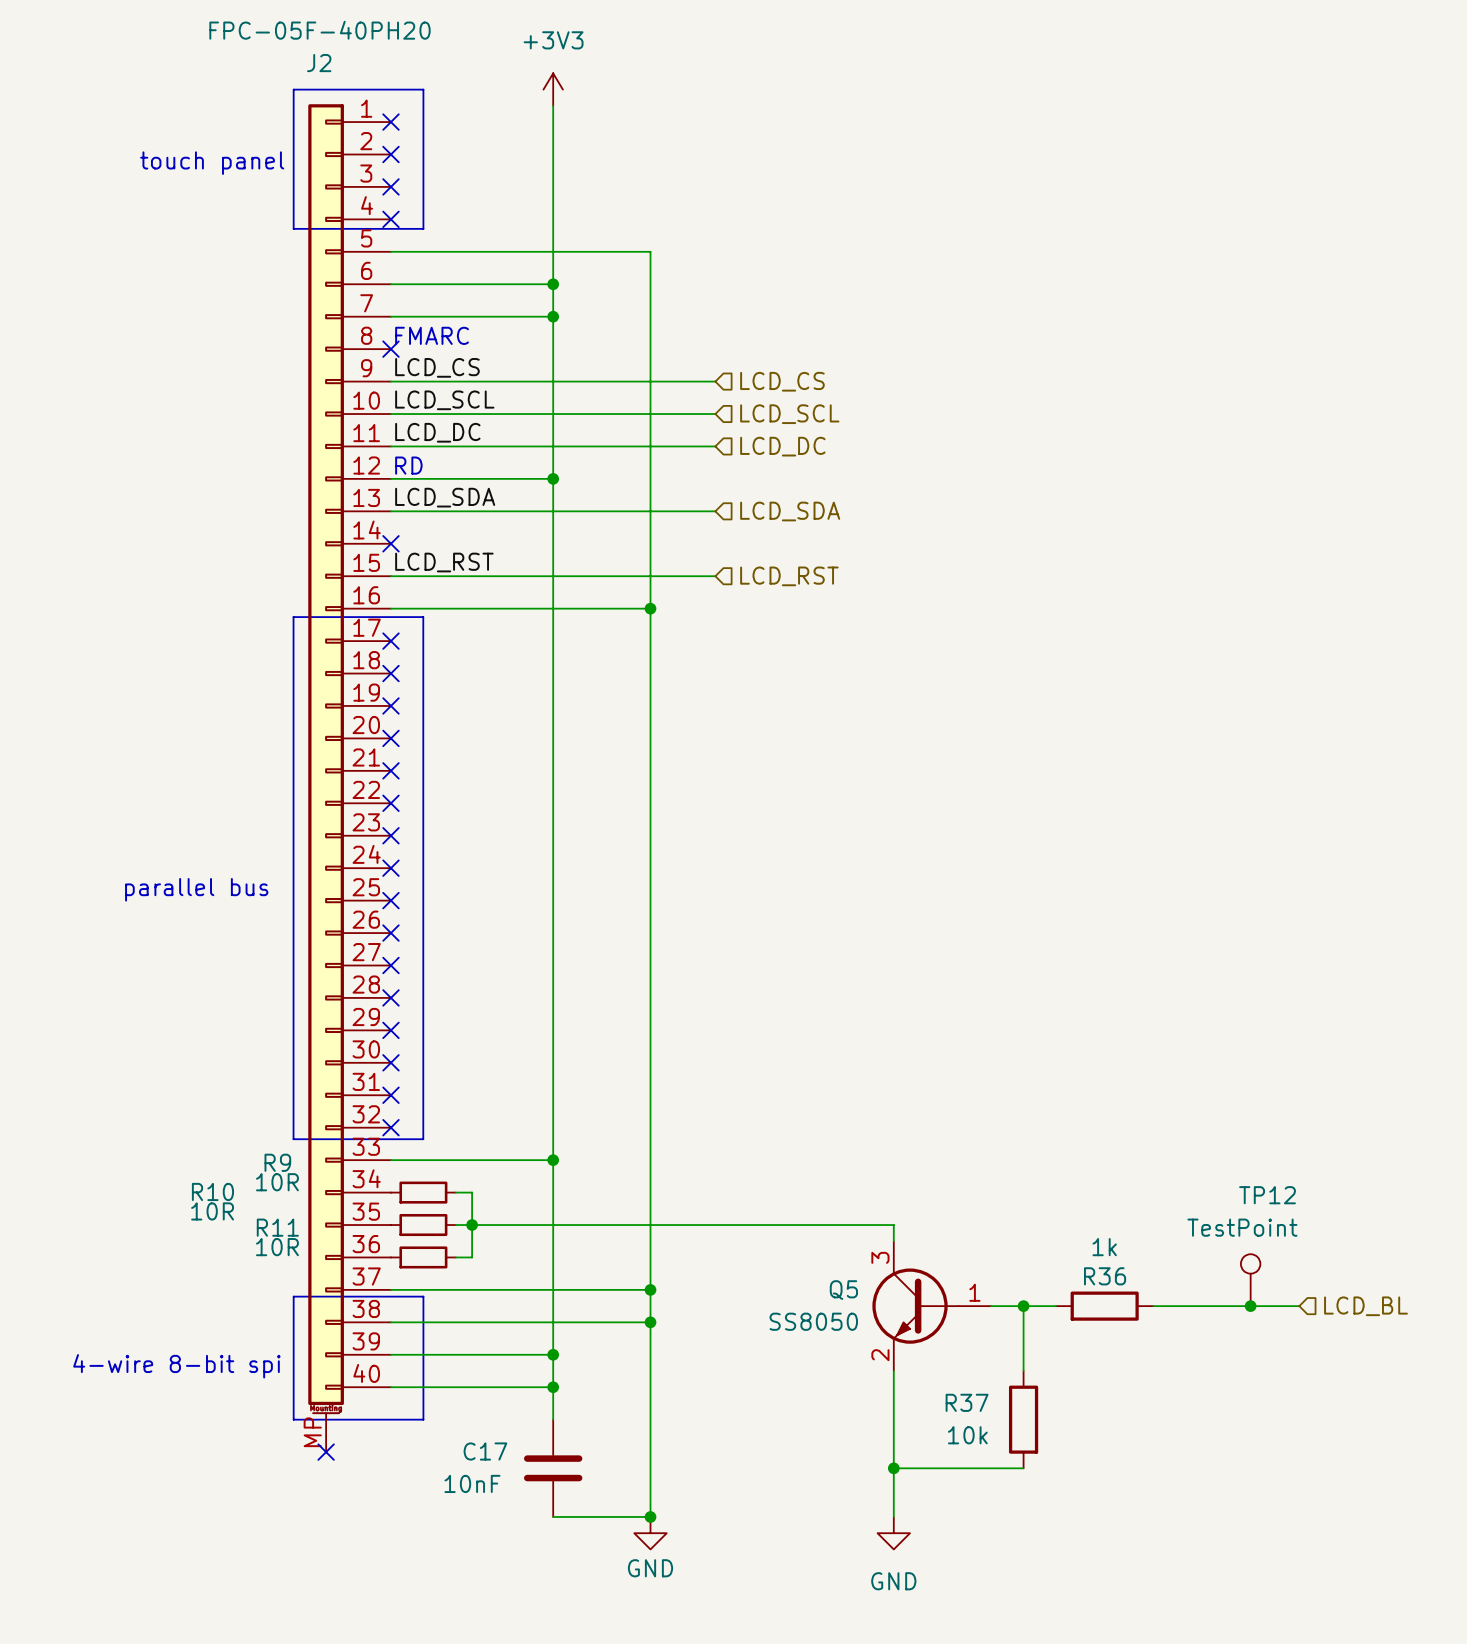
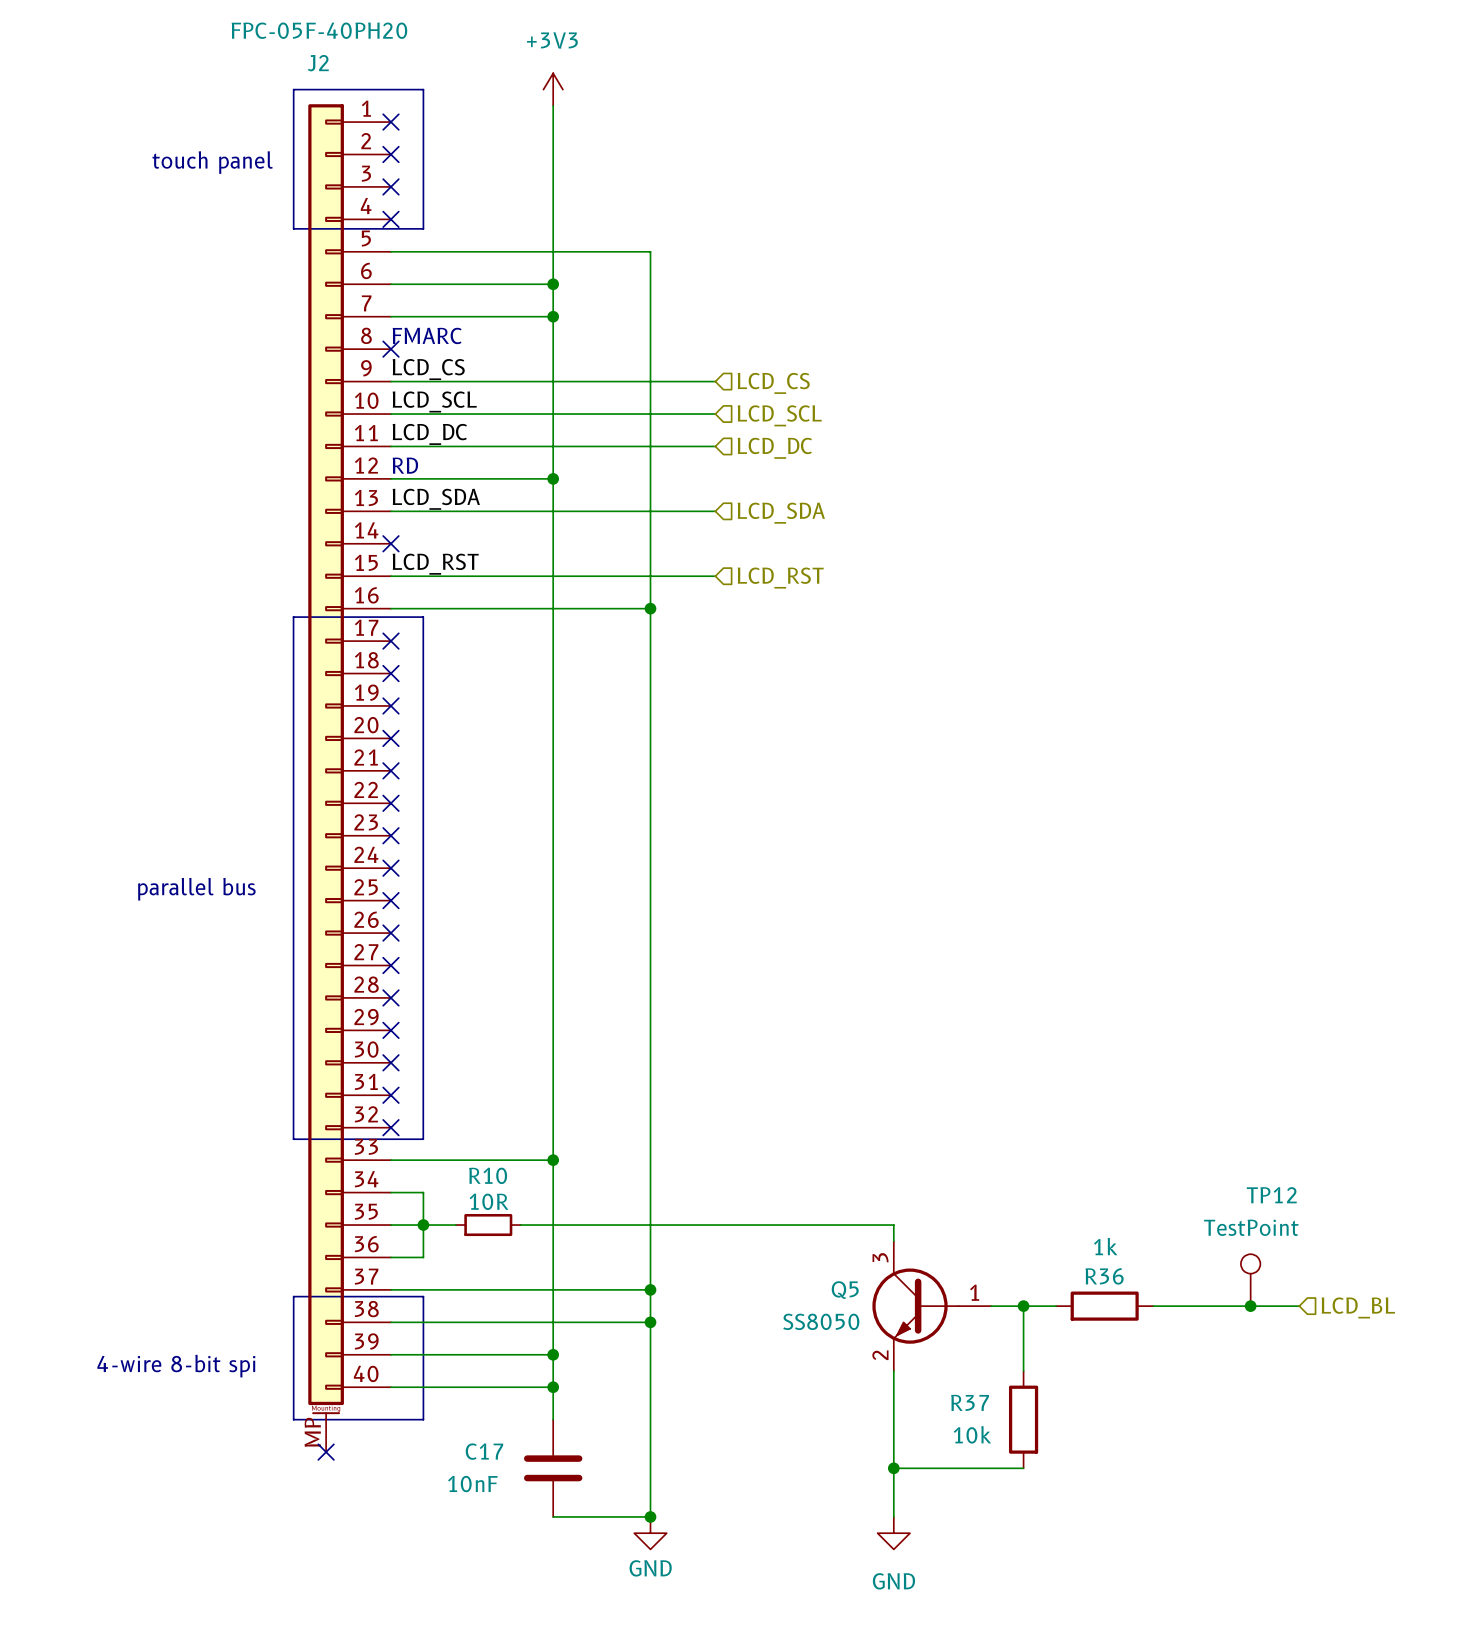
R10 name position: R10 (212, 1191) -> R10 (488, 1175)
wire: none -> (390, 1192) (423, 1192) (423, 1257) (390, 1257)
R9: 10R (423, 1192) -> none
wire: (455, 1192) (472, 1192) (472, 1257) (455, 1257) -> none
R10 value position: 10R (212, 1211) -> 10R (489, 1201)
R10 position: (423, 1225) -> (488, 1225)
wire: (455, 1225) (520, 1225) -> (455, 1225) (390, 1225)
junction position: (472, 1225) -> (423, 1225)
R11: 10R (423, 1257) -> none

